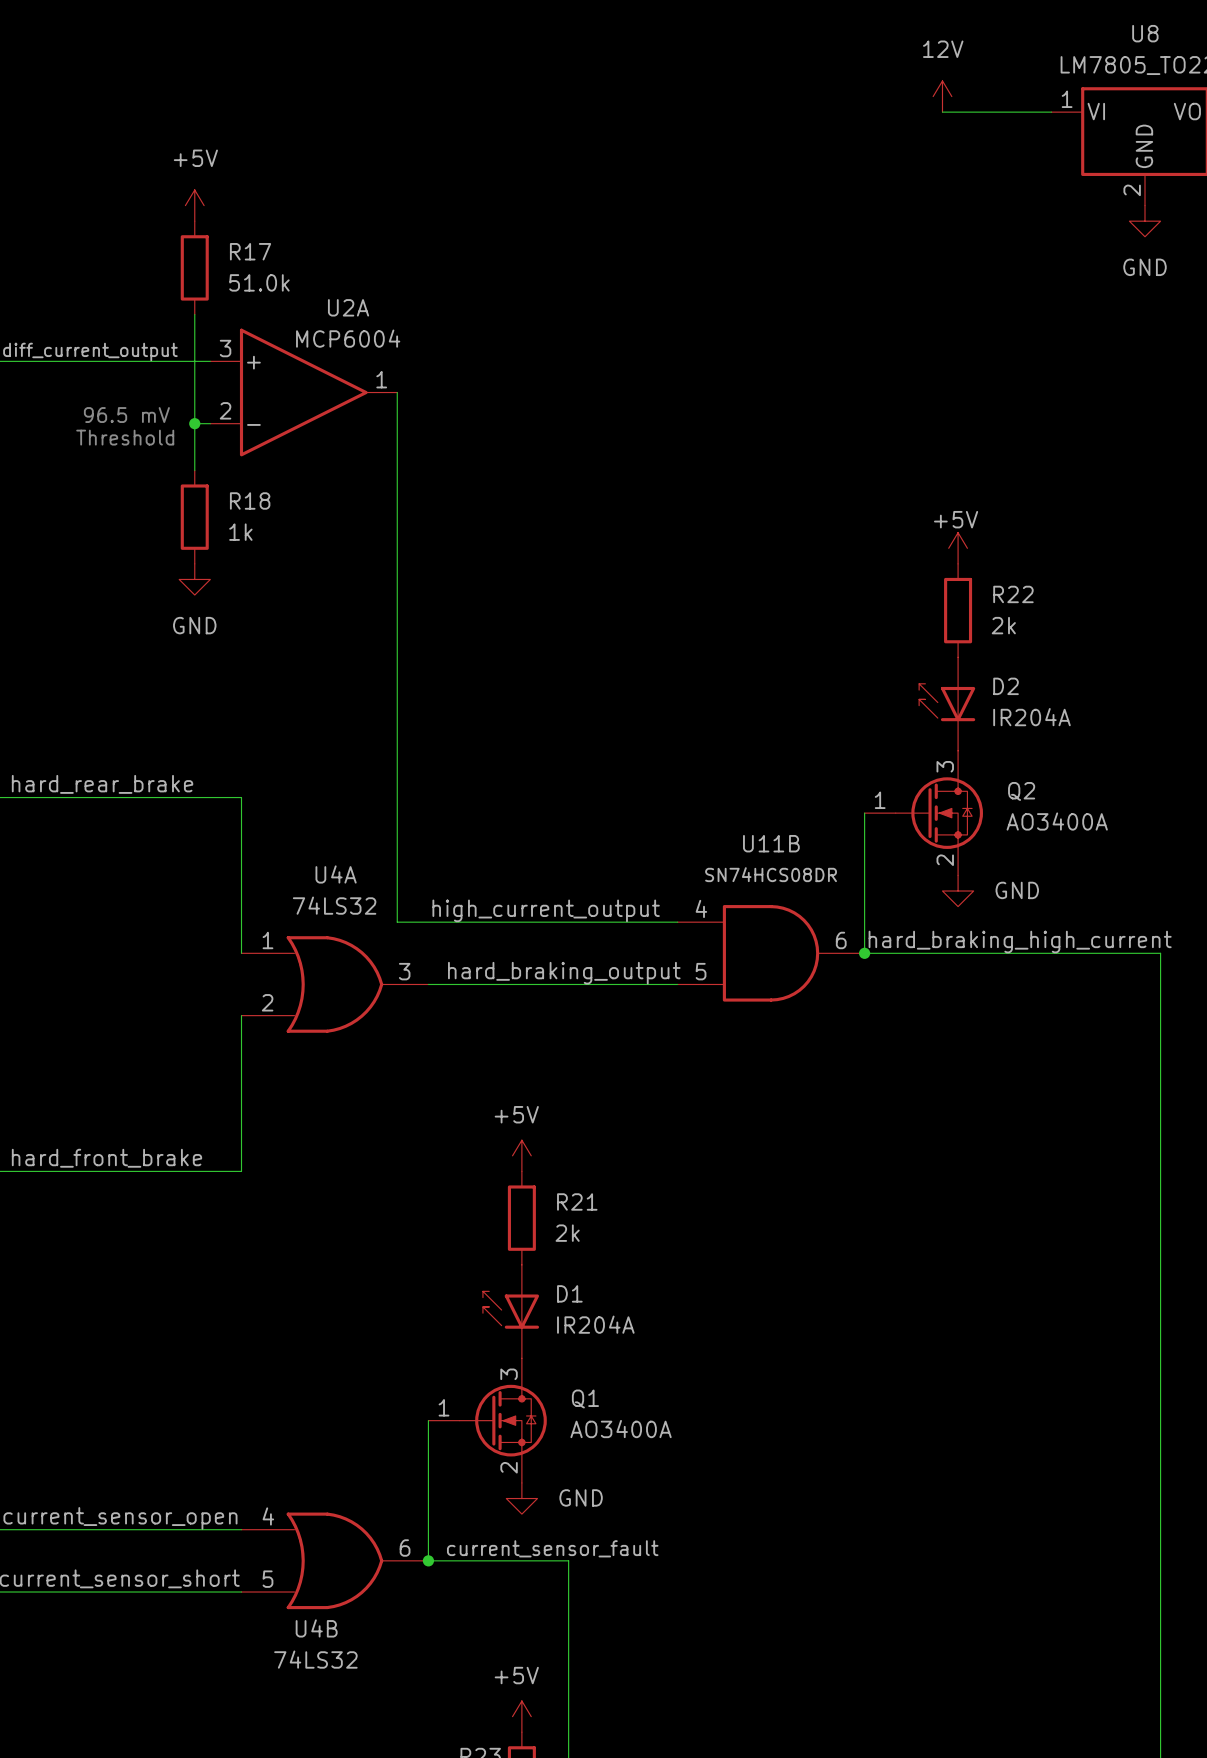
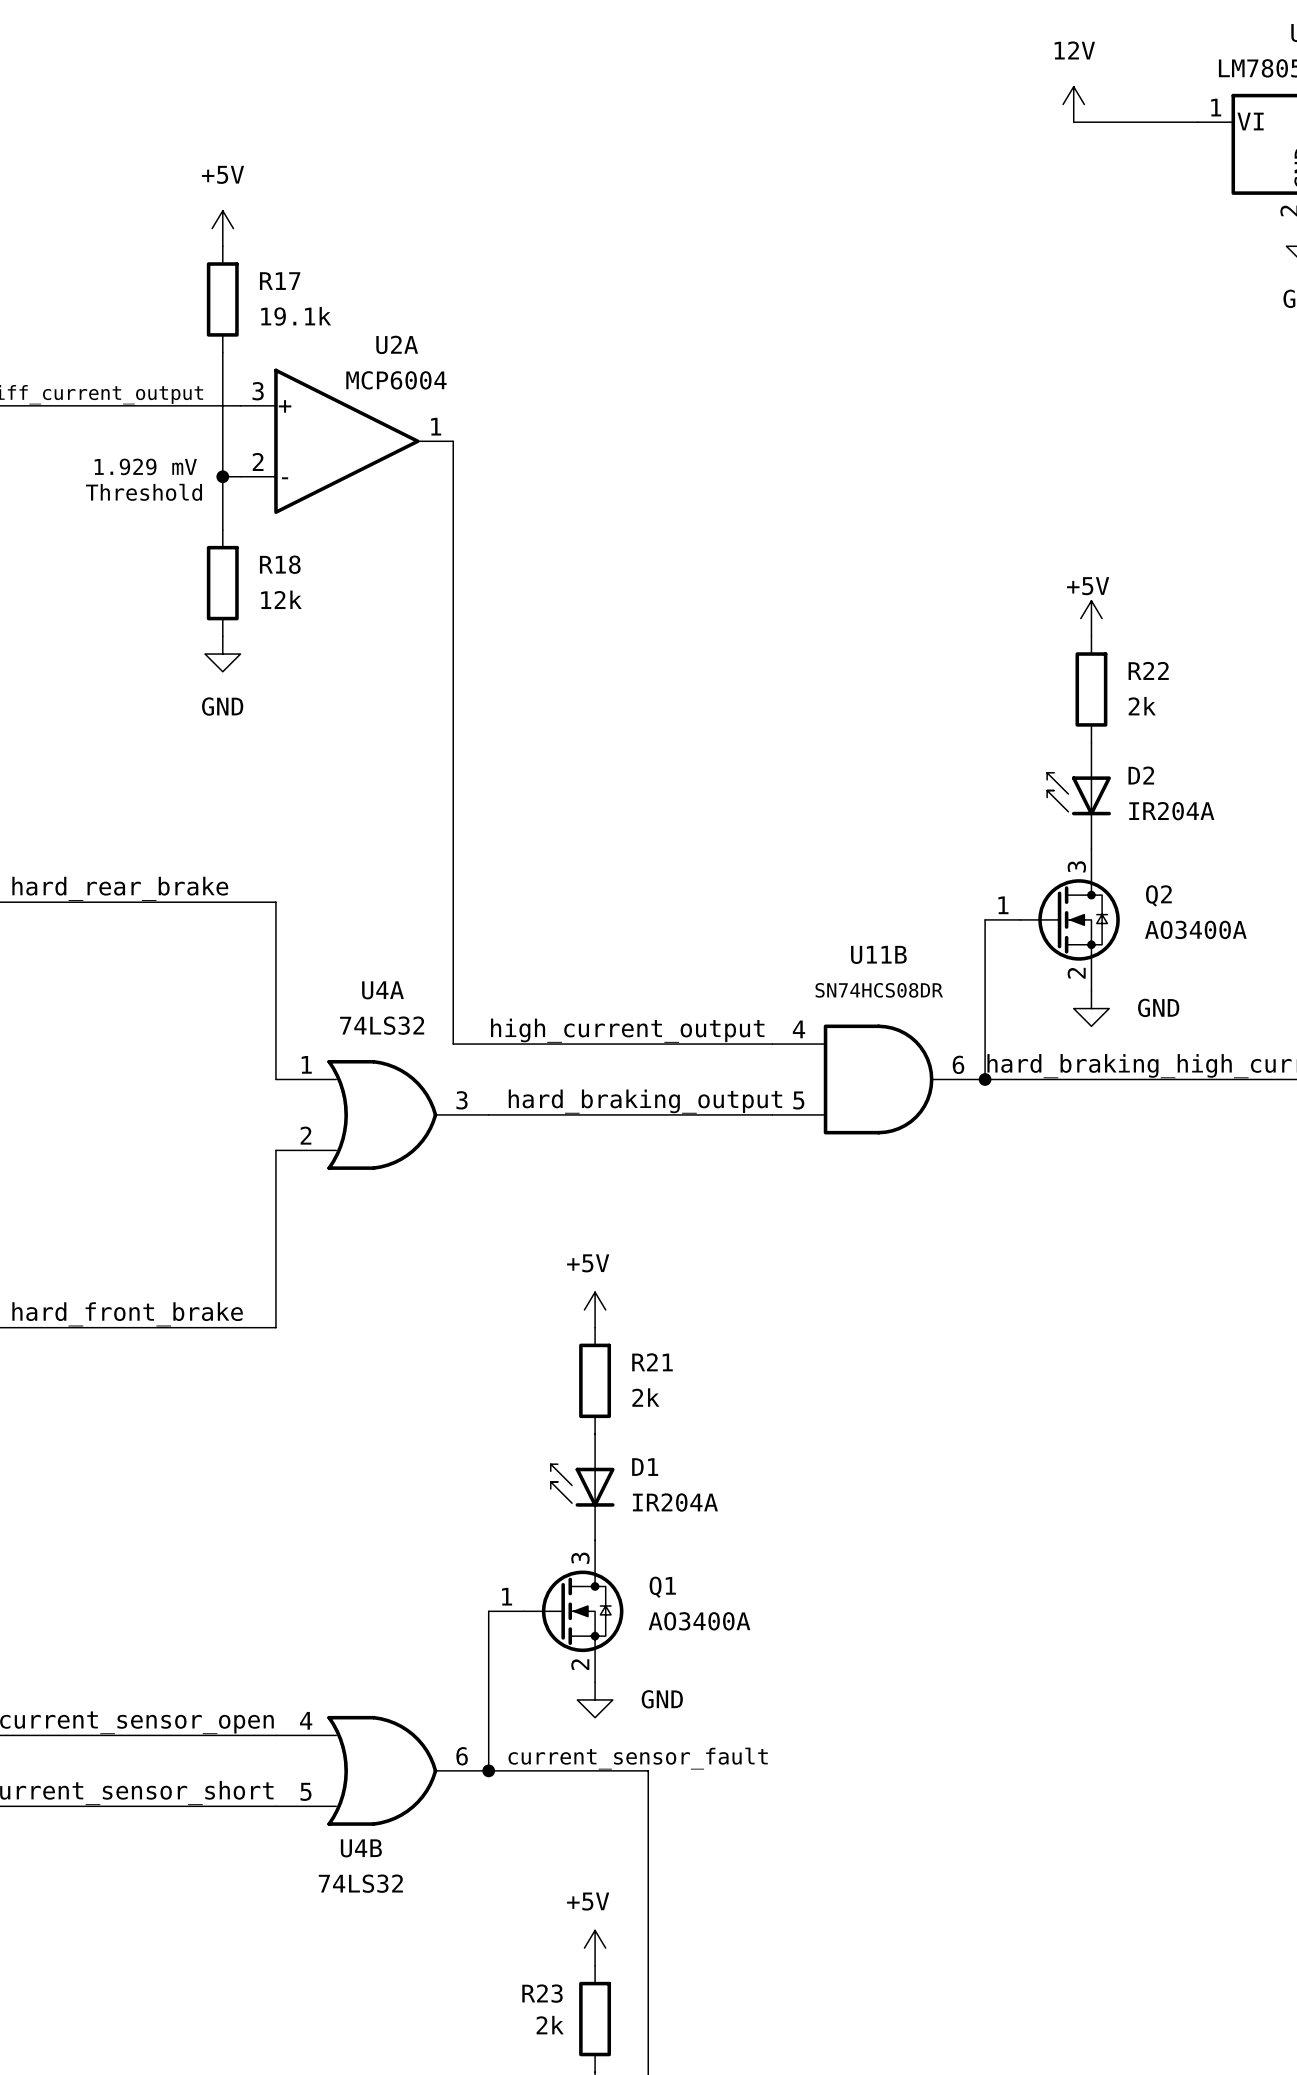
R17 value: 51.0k (259, 282) -> 19.1k (296, 316)
text: 96.5 mV (126, 415) -> 1.929 mV (145, 466)
R18 value: 1k (240, 532) -> 12k (281, 599)

